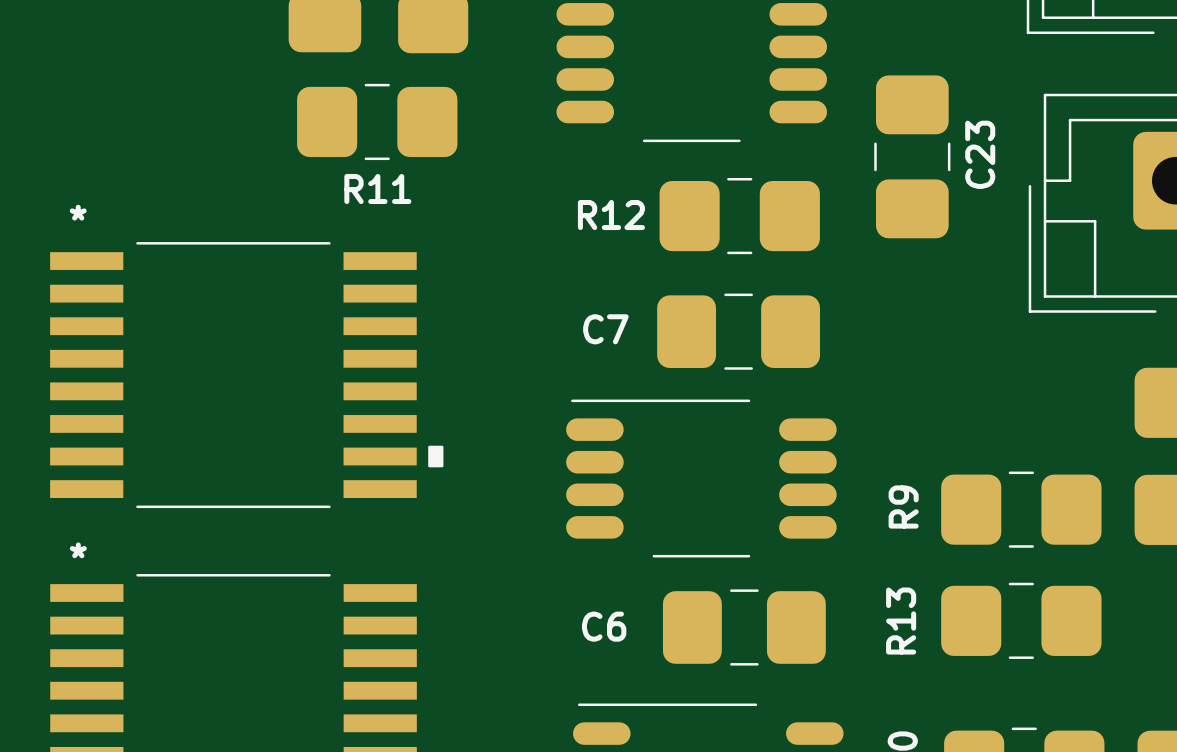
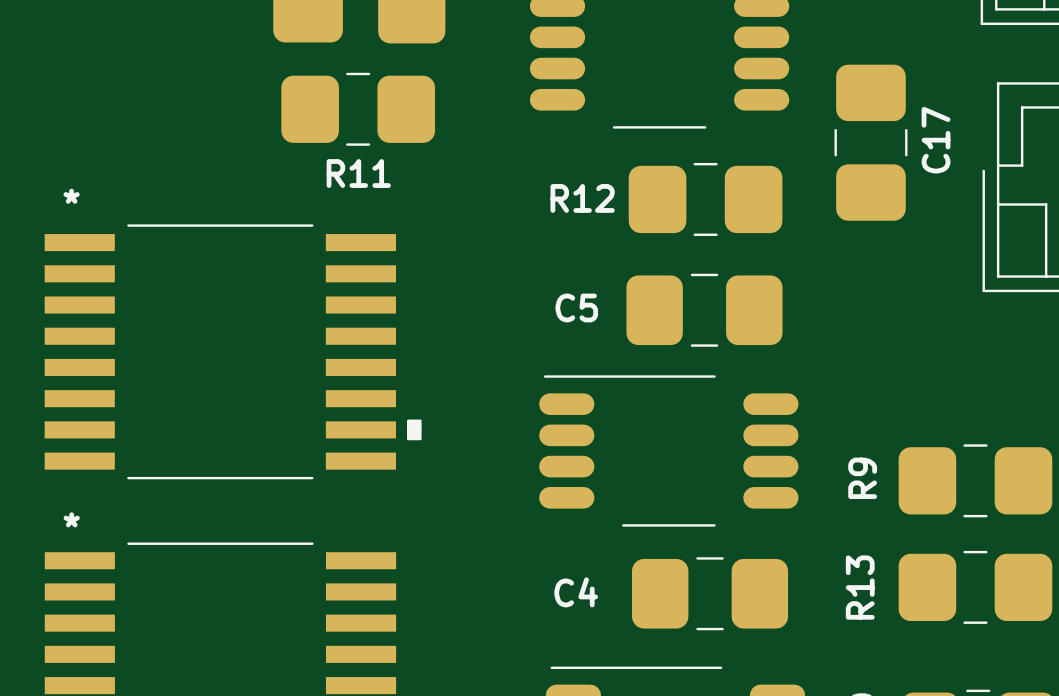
C23 name: C23 (980, 154) -> C17 (936, 140)
C7 name: C7 (605, 329) -> C5 (576, 307)
C6 name: C6 (604, 626) -> C4 (576, 592)

